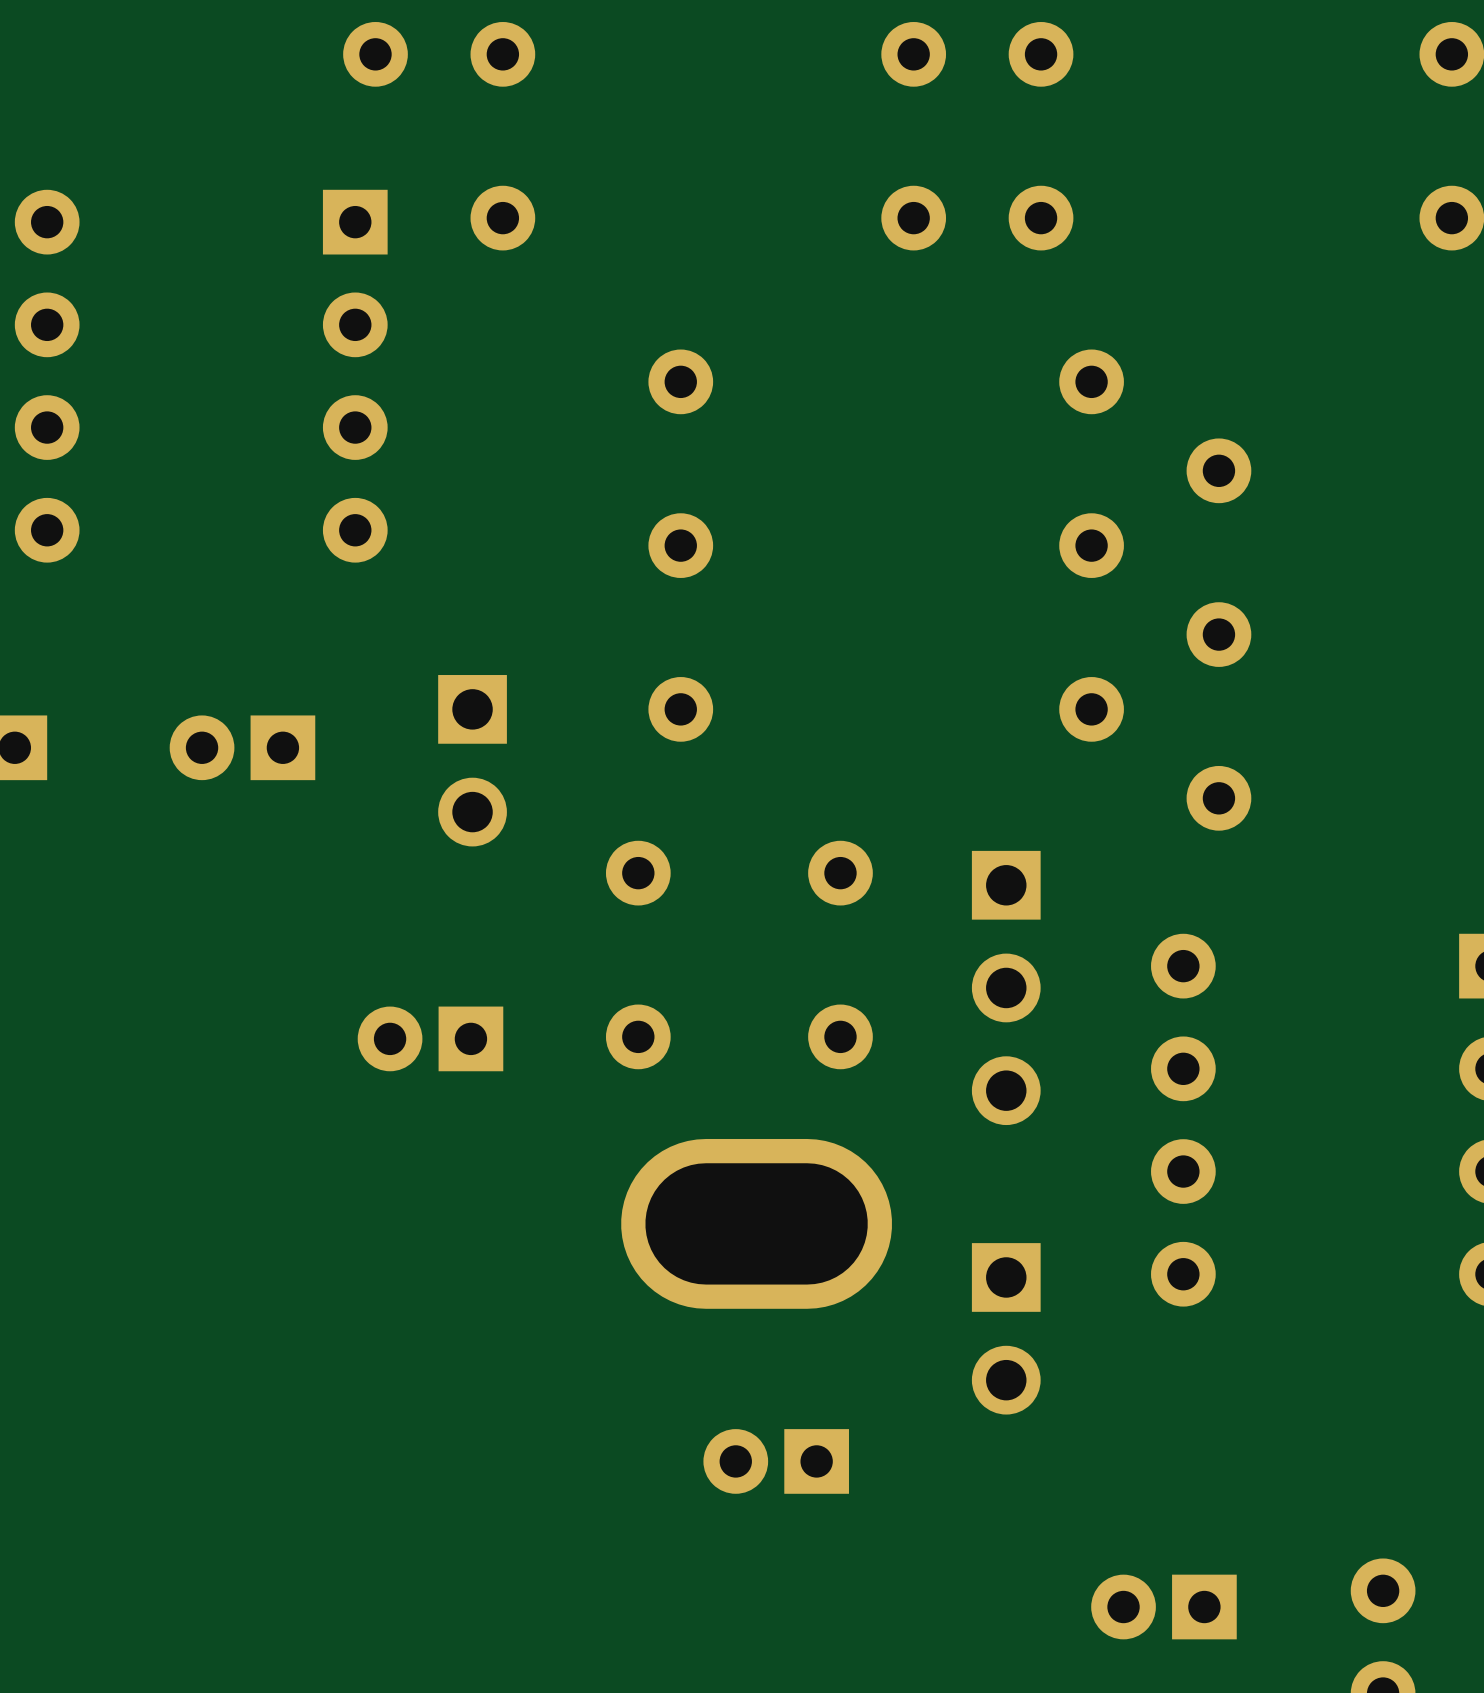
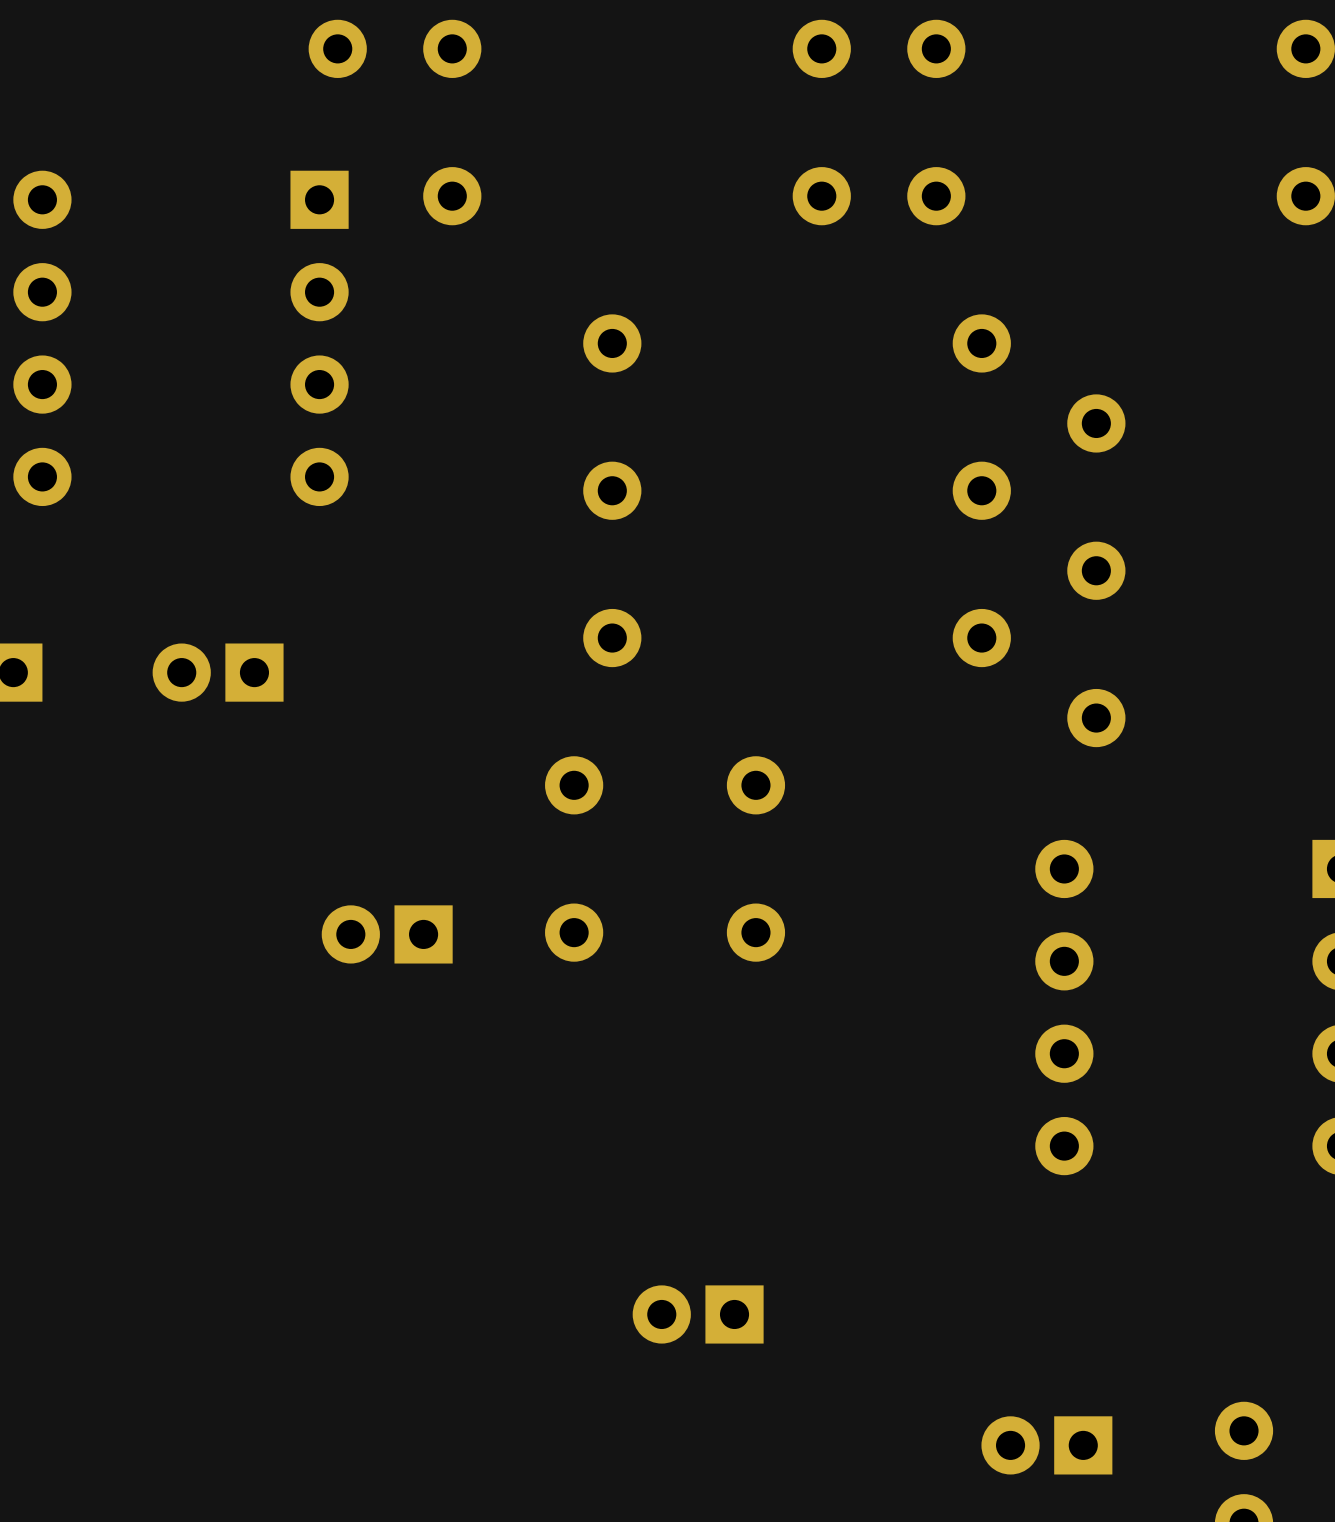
part: (472, 760) -> none
part: (1006, 987) -> none
part: (756, 1223) -> none
part: (1006, 1328) -> none

